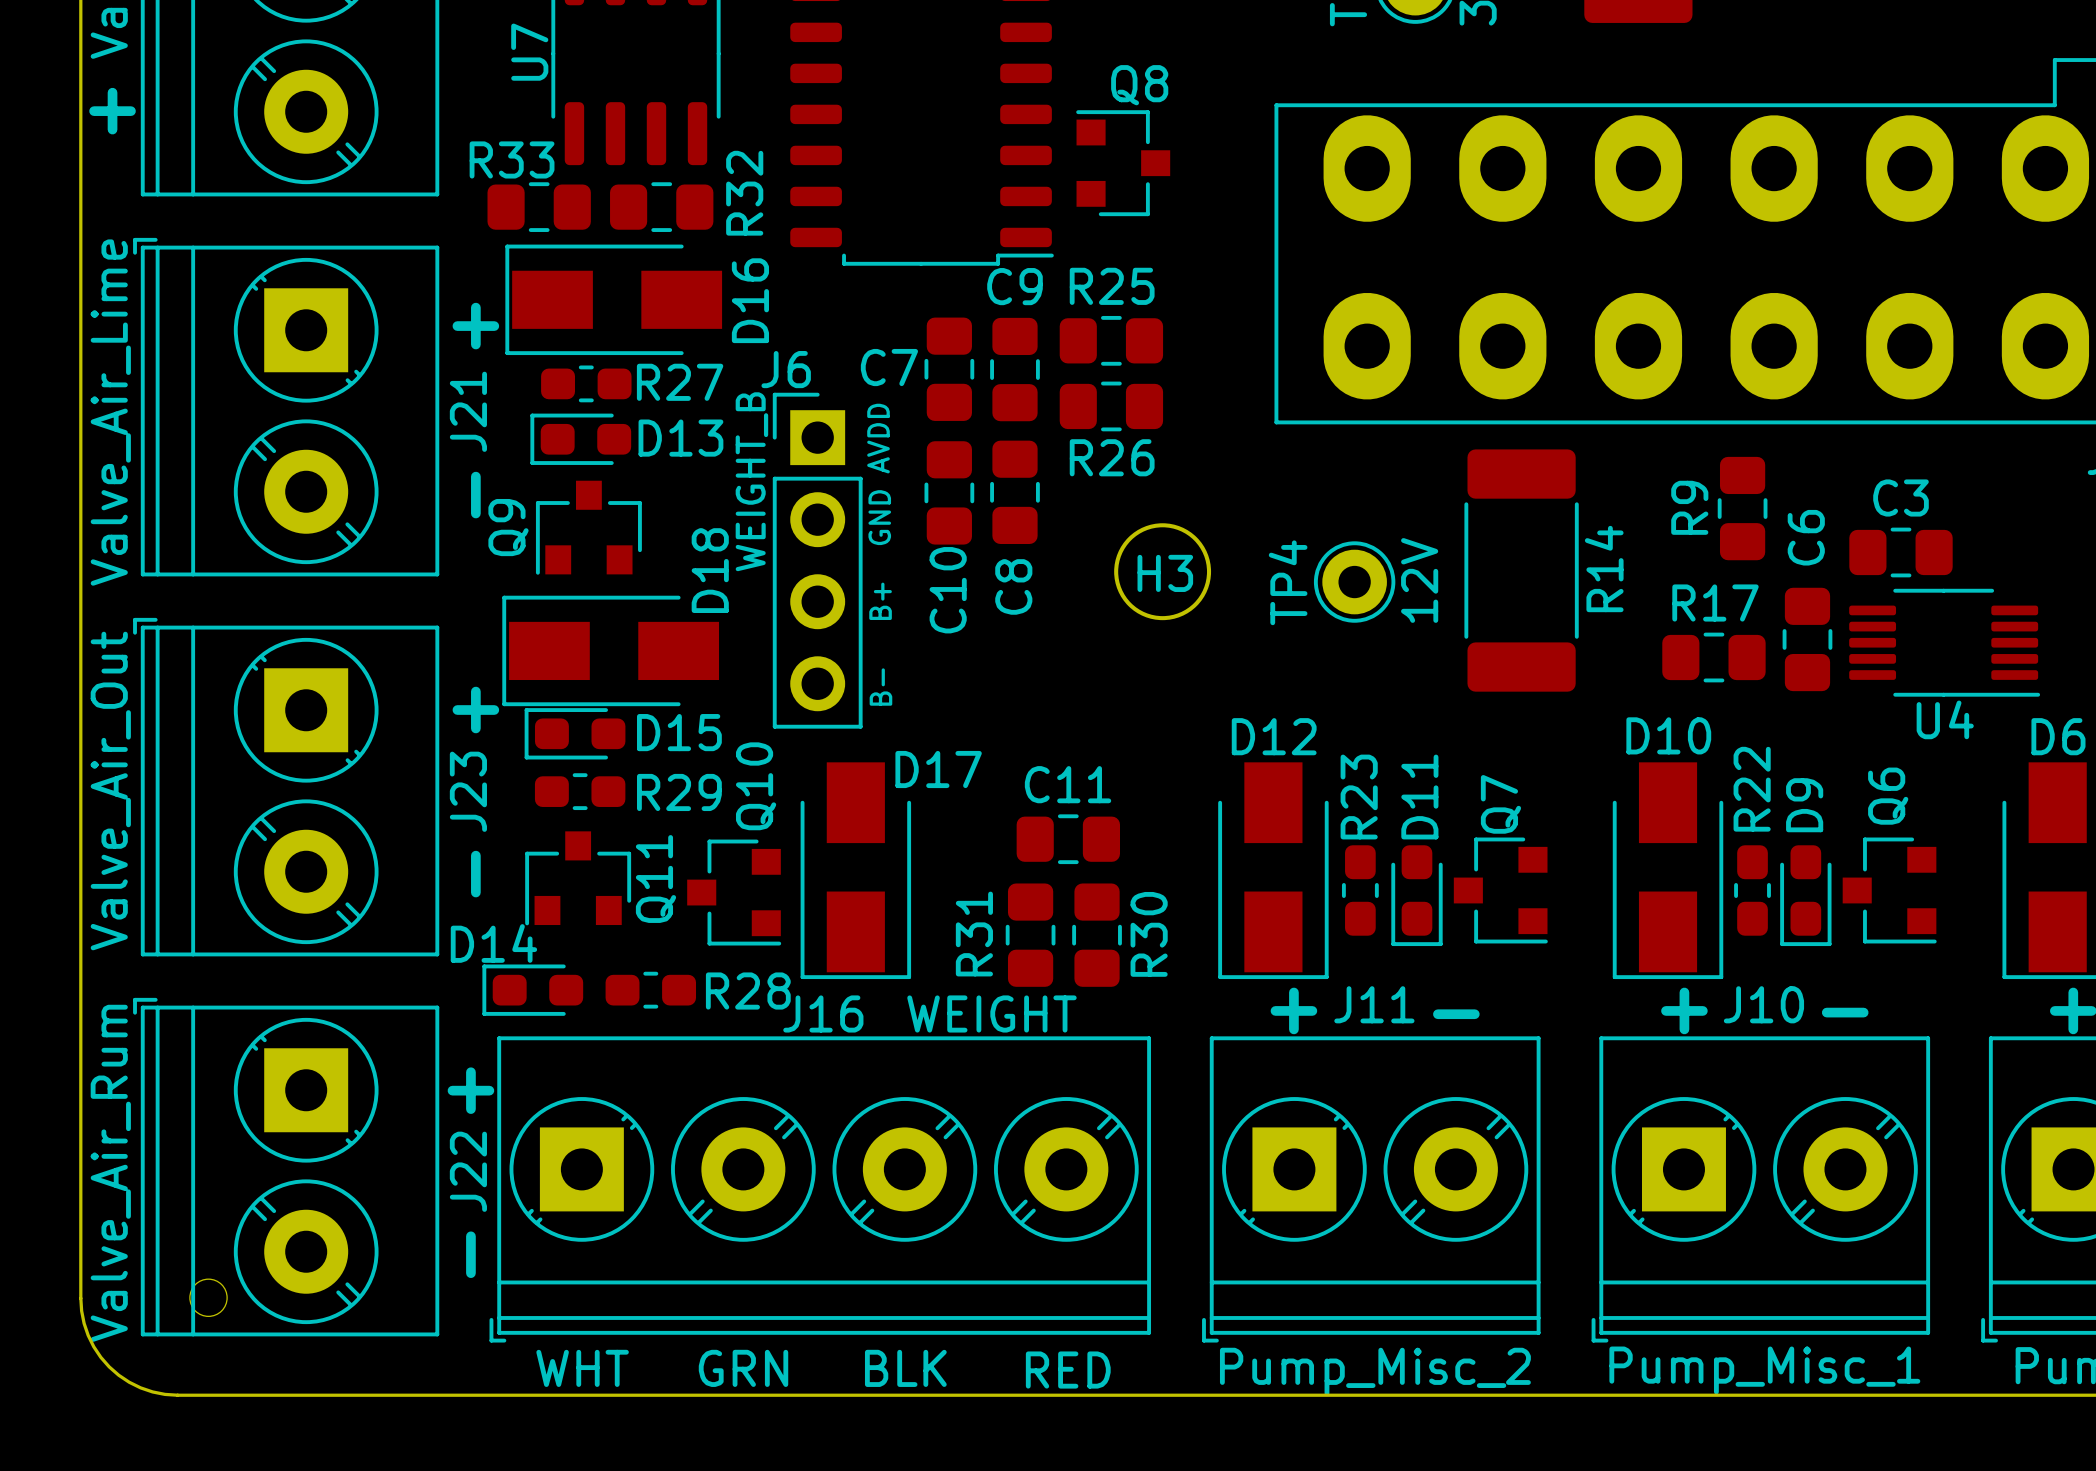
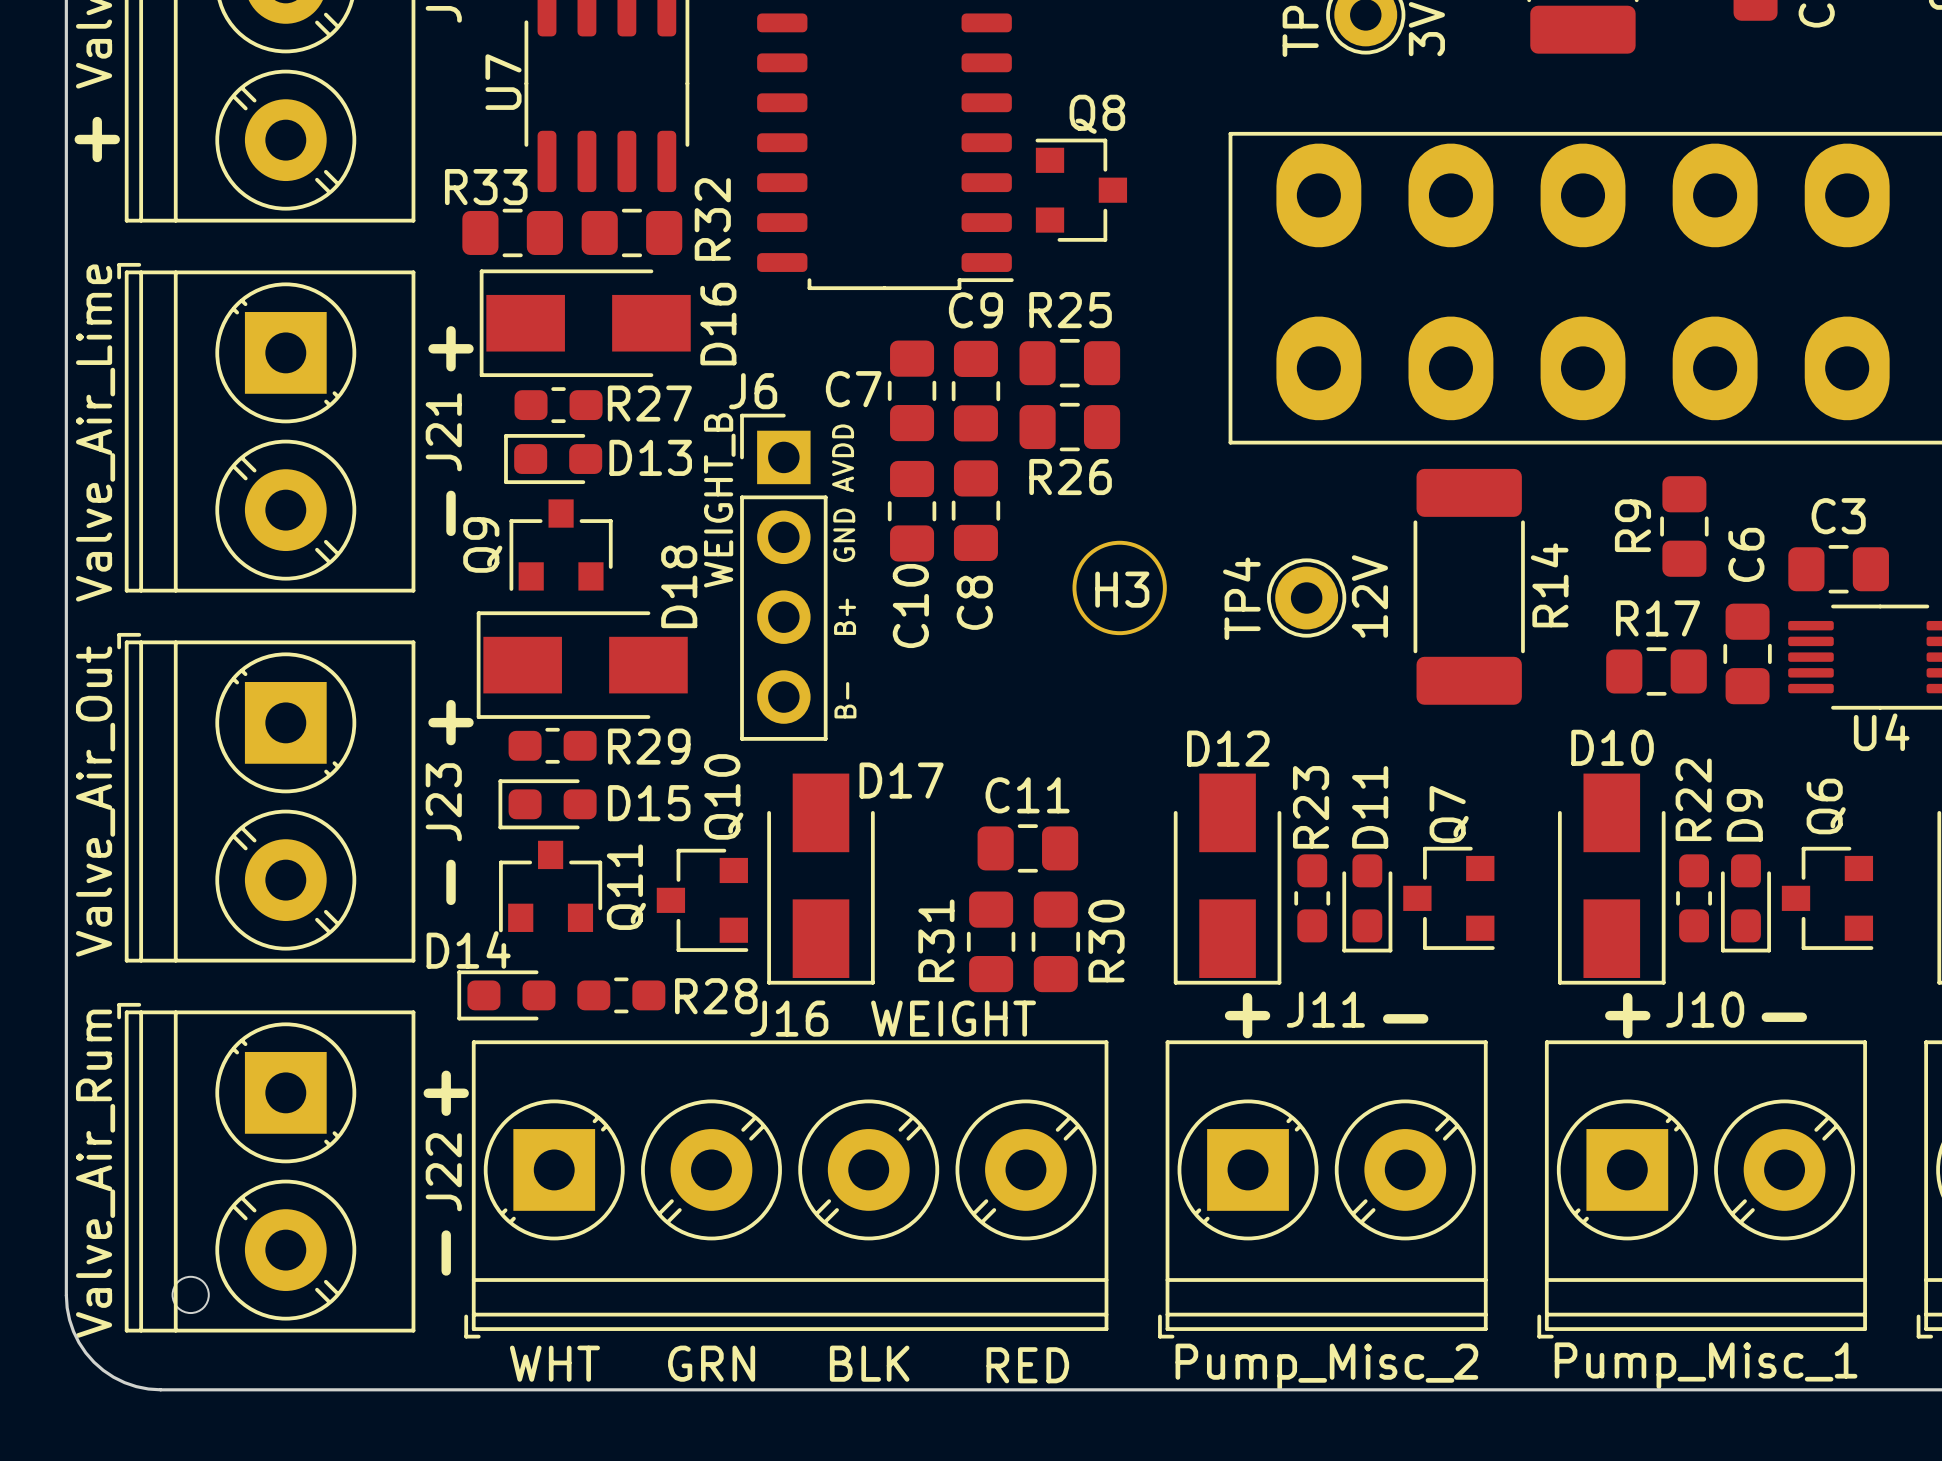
D15 position: (575, 733) -> (547, 804)
R29 position: (580, 791) -> (552, 745)

